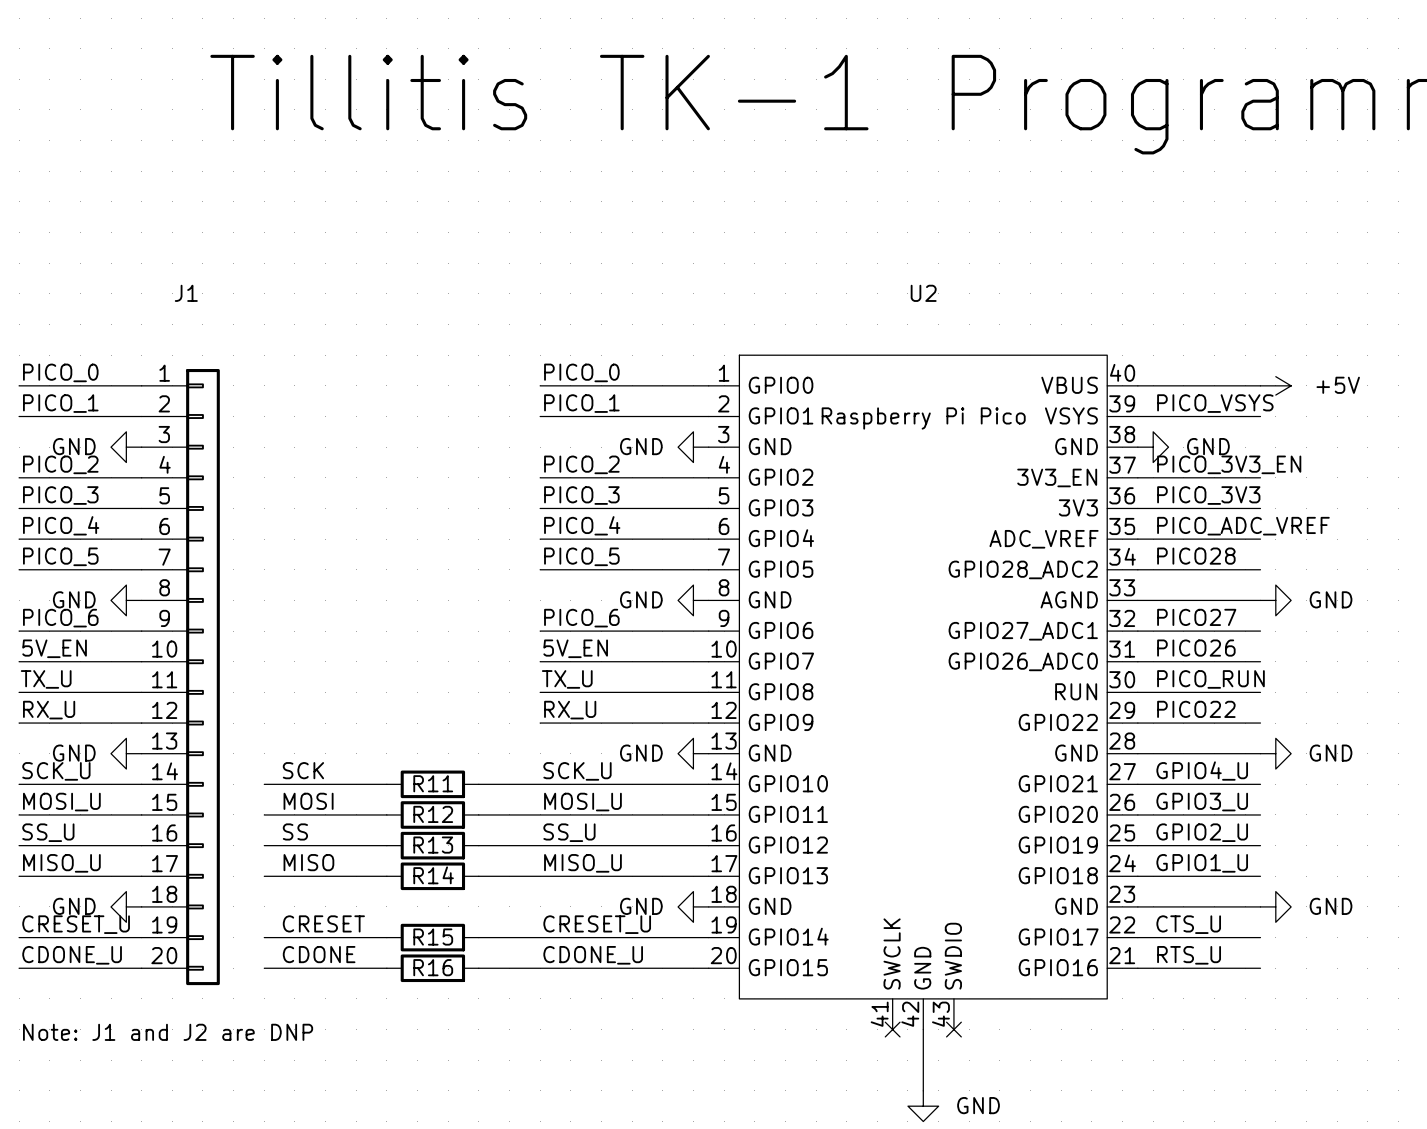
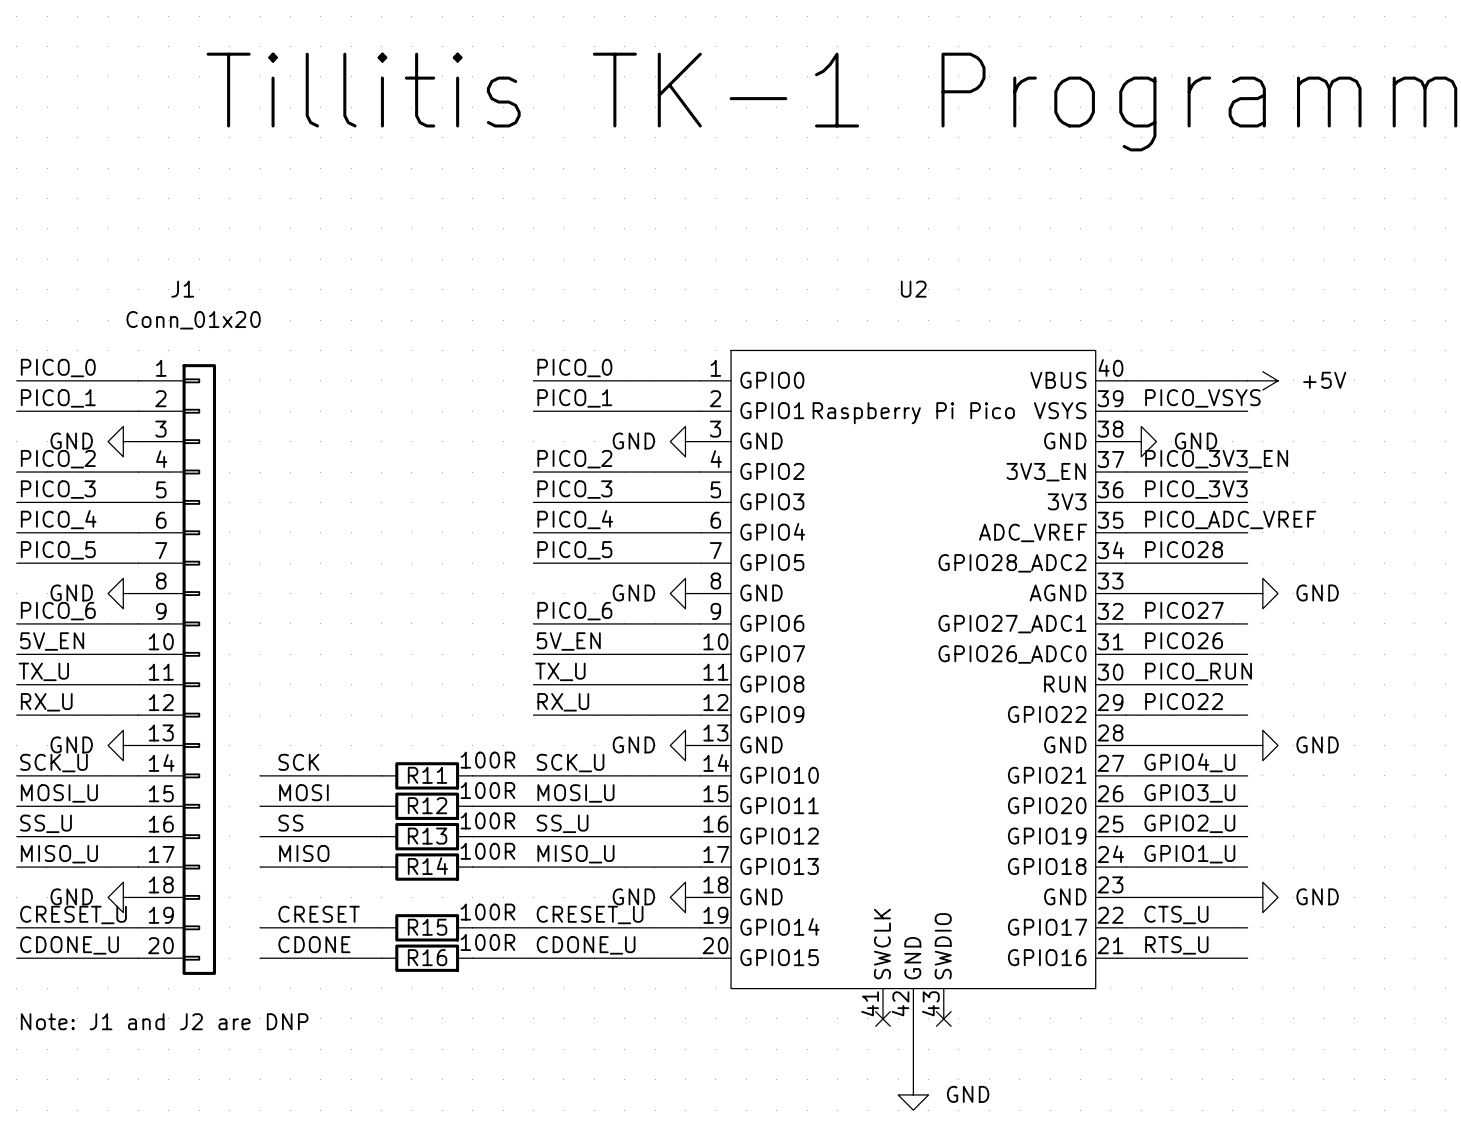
J1 value: none -> Conn_01x20 (193, 320)
R11 value: none -> 100R (487, 760)
R12 value: none -> 100R (487, 790)
R13 value: none -> 100R (487, 820)
R14 value: none -> 100R (487, 851)
R15 value: none -> 100R (487, 912)
R16 value: none -> 100R (487, 942)

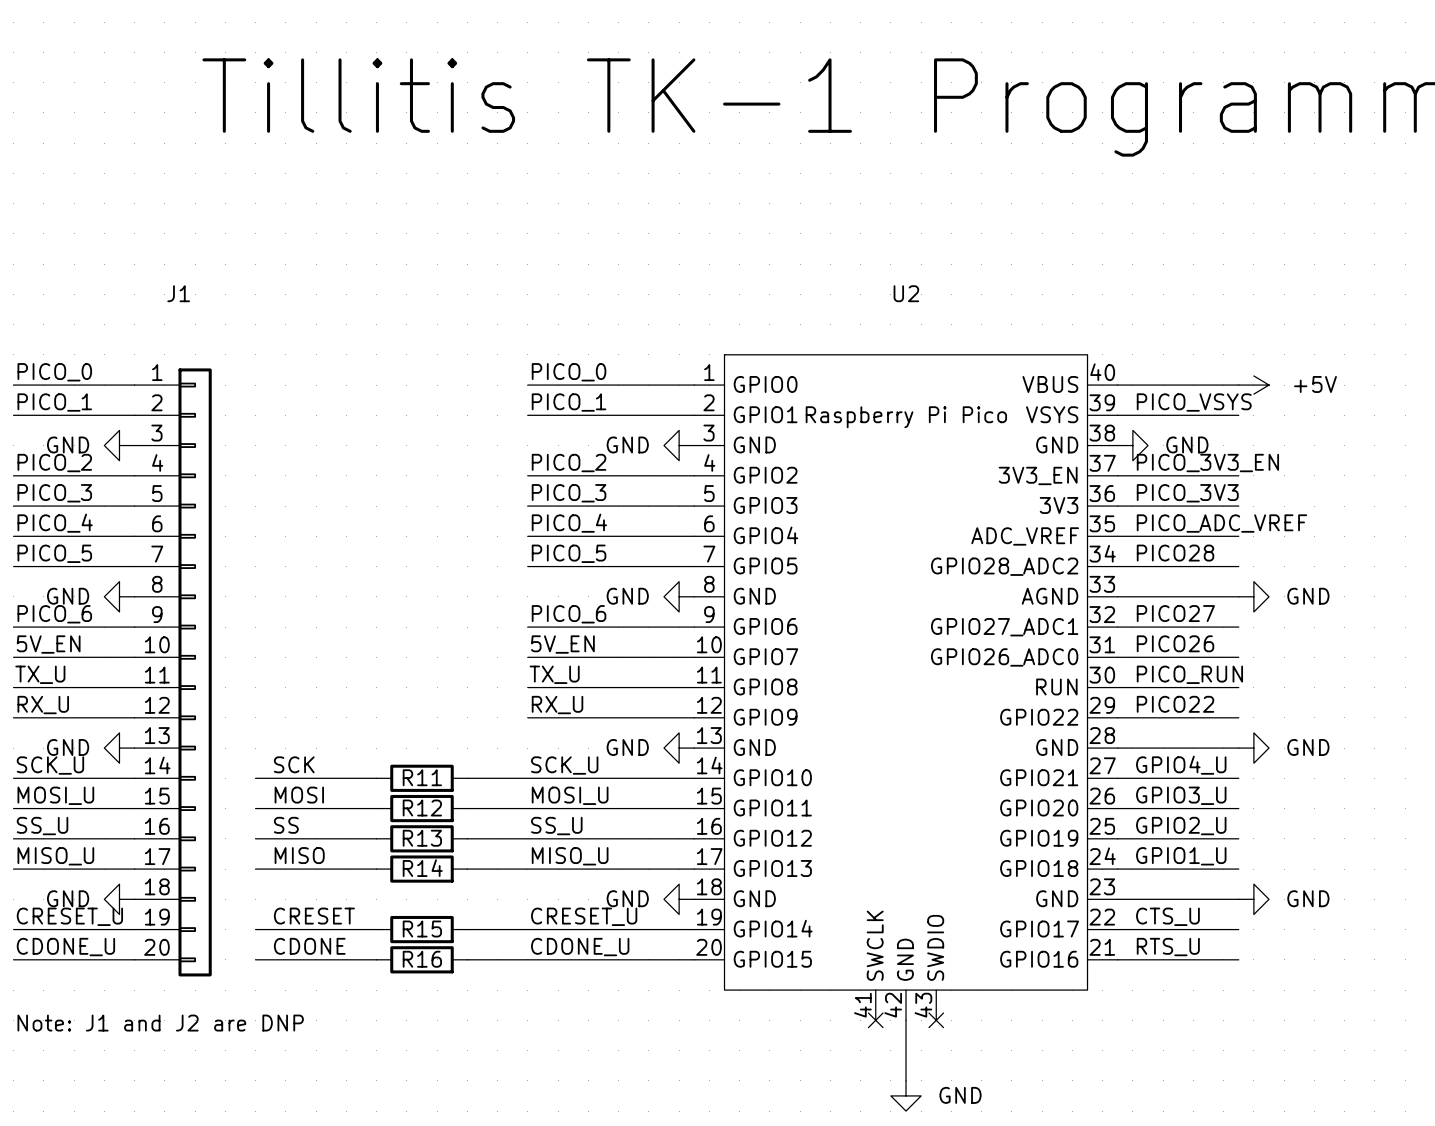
J1 value: Conn_01x20 (193, 320) -> none
R11 value: 100R (487, 760) -> none
R12 value: 100R (487, 790) -> none
R13 value: 100R (487, 820) -> none
R14 value: 100R (487, 851) -> none
R15 value: 100R (487, 912) -> none
R16 value: 100R (487, 942) -> none

